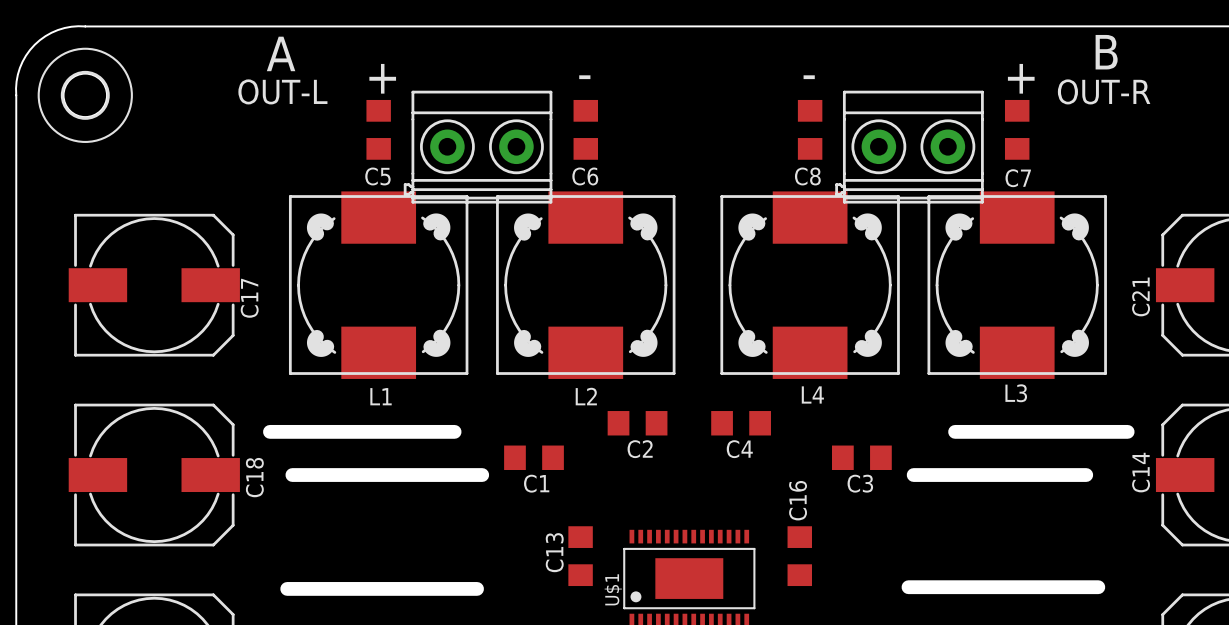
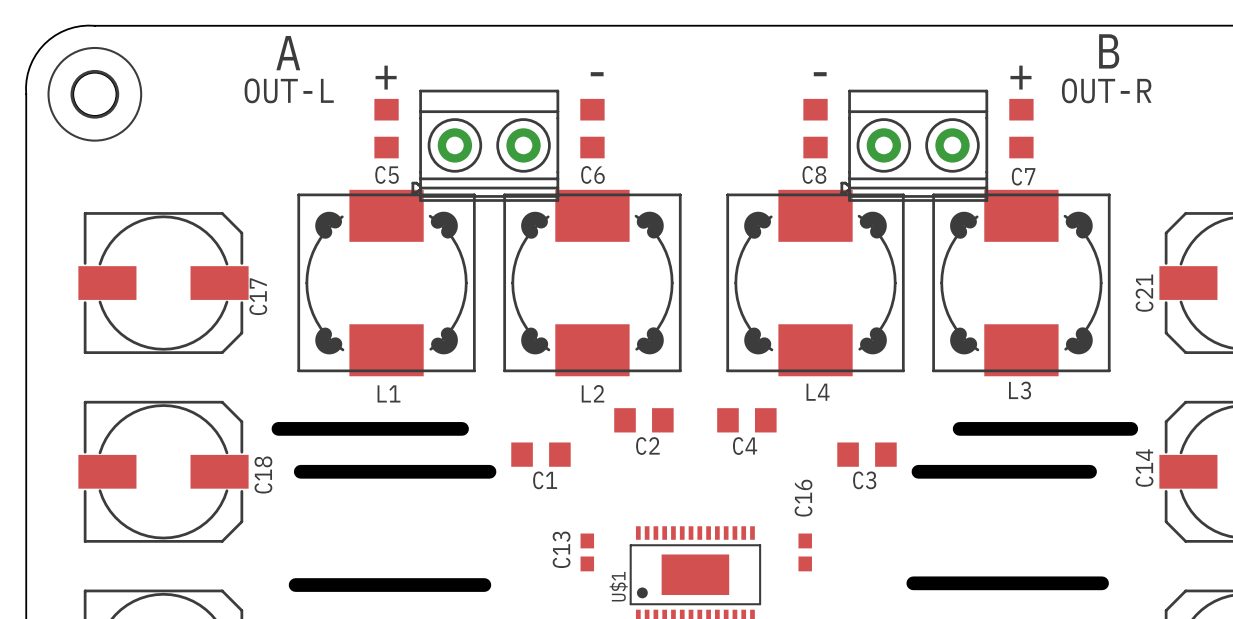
C13 footprint: [568, 526, 593, 587] -> [580, 533, 595, 572]
C16 footprint: [787, 526, 812, 587] -> [798, 533, 812, 572]

